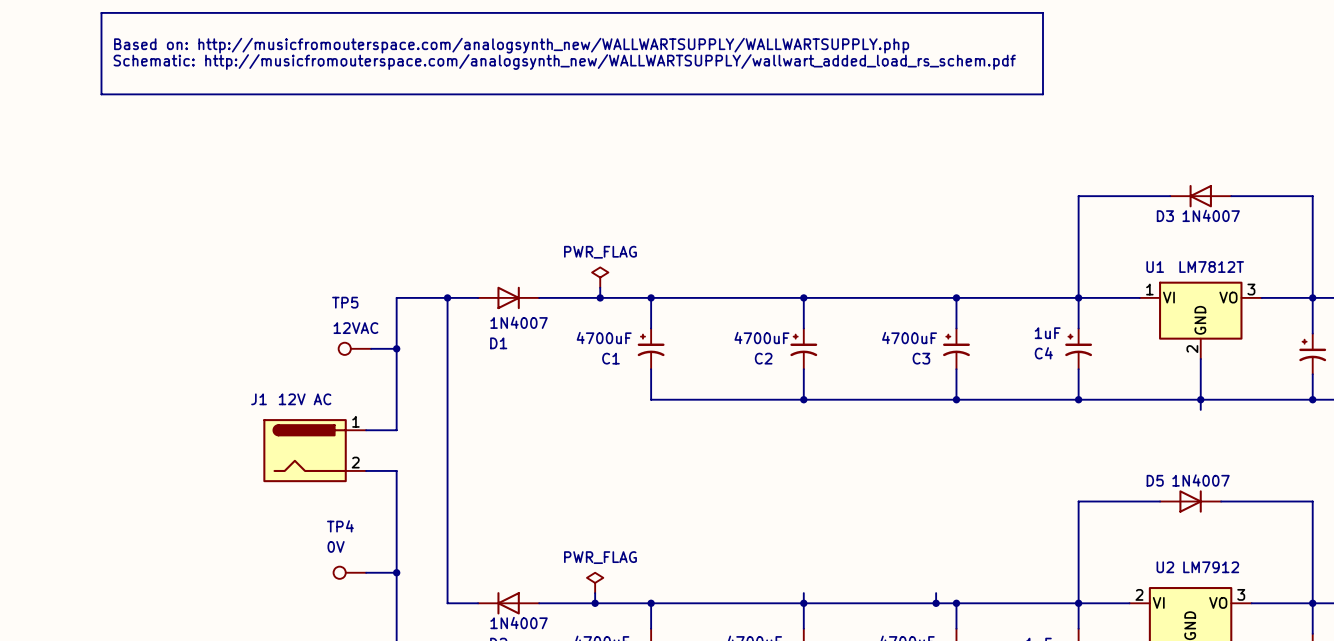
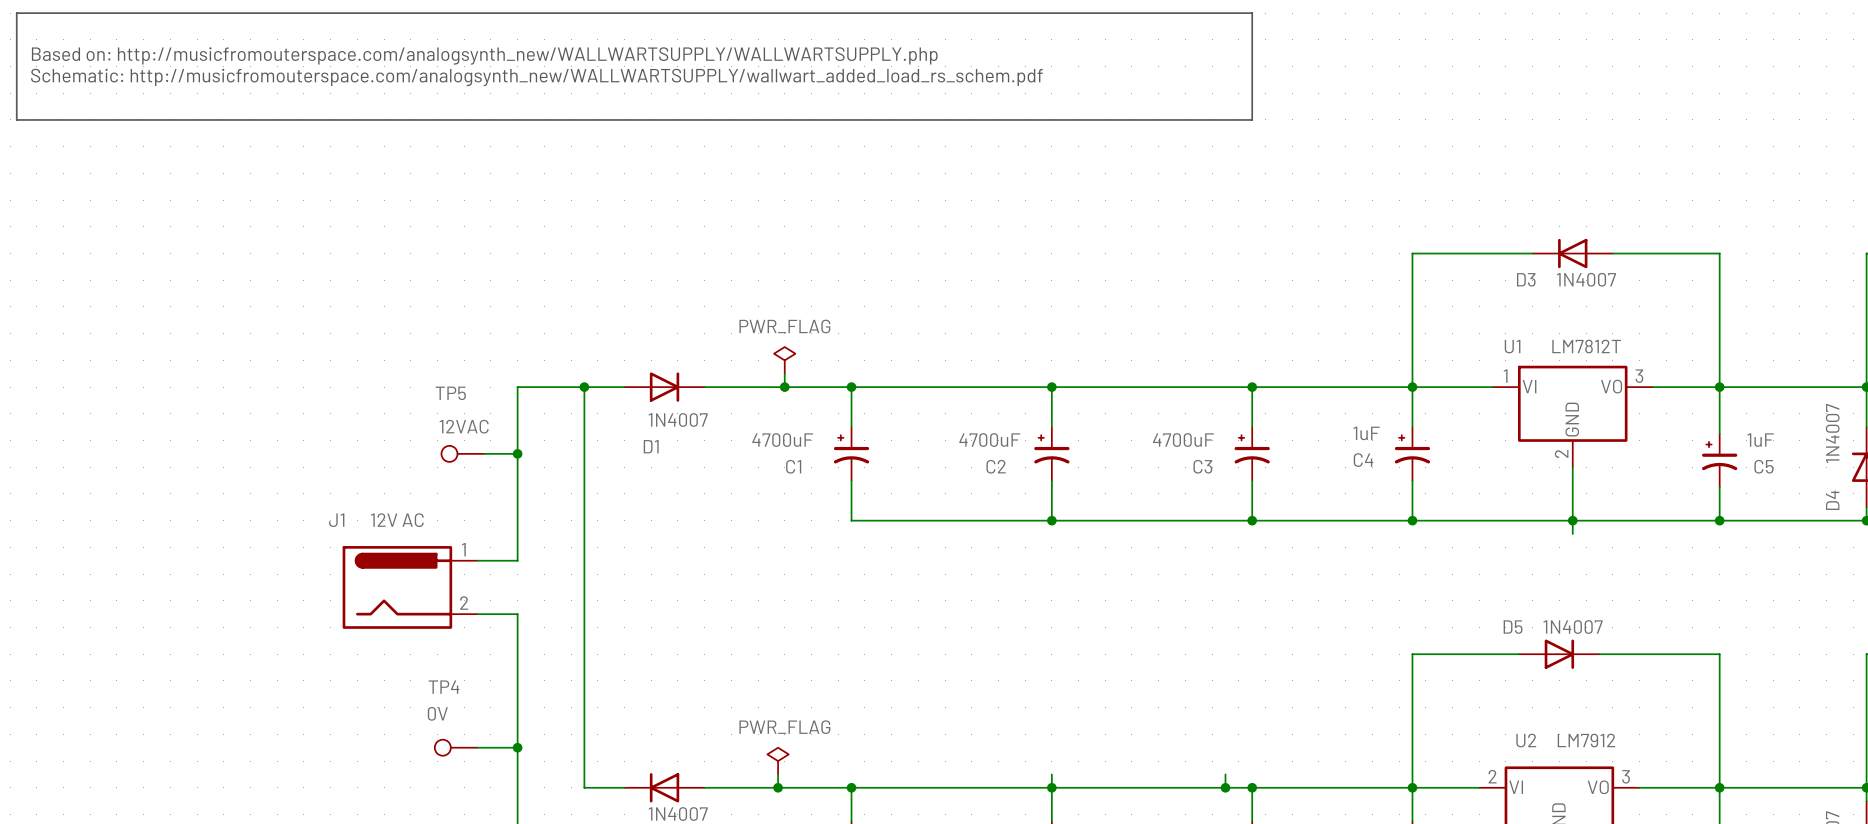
line: (101, 12) (101, 94) -> (130, 13) (16, 13) (16, 119) (130, 119)
line: (956, 12) (1042, 12) (1042, 94) (956, 94) -> (1252, 13) (1252, 119)
text position: Based on: http://musicfromouterspace.com/analogsynth_new/WALLWARTSUPPLY/WALLWARTSUPPLY.php (511, 45) -> Based on: http://musicfromouterspace.com/analogsynth_new/WALLWARTSUPPLY/WALLWARTSUPPLY.php (484, 55)
text position: Schematic: http://musicfromouterspace.com/analogsynth_new/WALLWARTSUPPLY/wallwart_added_load_rs_schem.pdf (564, 62) -> Schematic: http://musicfromouterspace.com/analogsynth_new/WALLWARTSUPPLY/wallwart_added_load_rs_schem.pdf (536, 77)

